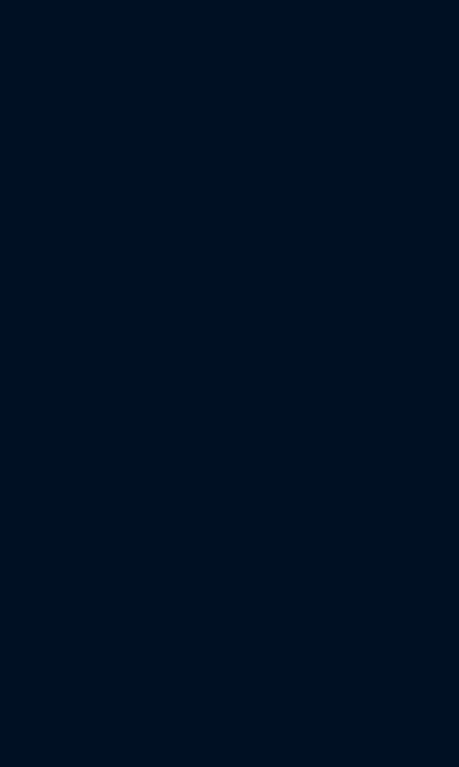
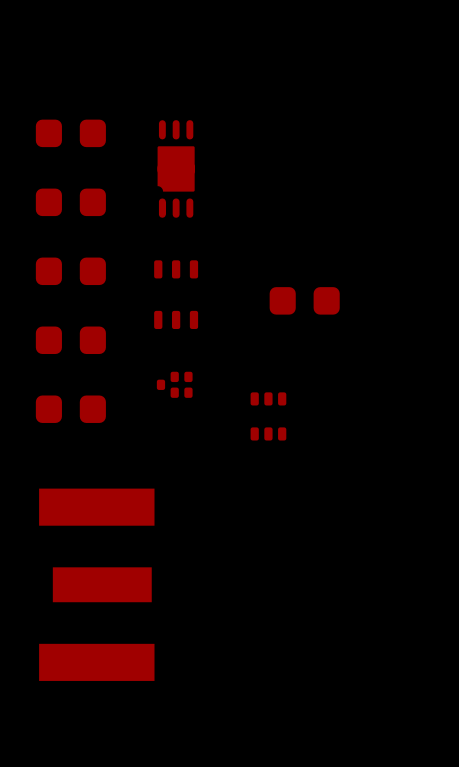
part: none -> (70, 133)
part: none -> (176, 168)
part: none -> (70, 202)
part: none -> (70, 271)
part: none -> (176, 294)
part: none -> (304, 300)
part: none -> (70, 340)
part: none -> (174, 384)
part: none -> (70, 409)
part: none -> (268, 416)
part: none -> (96, 584)

